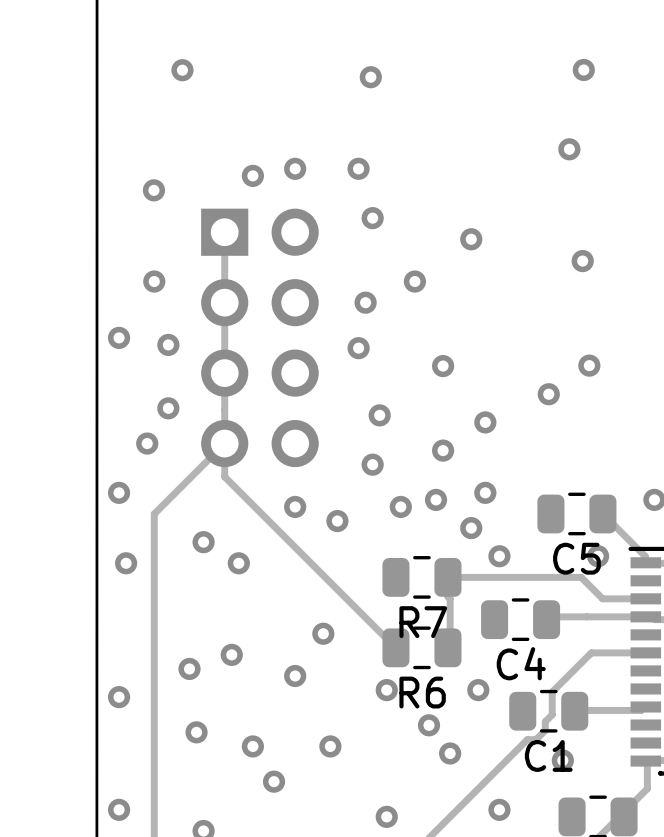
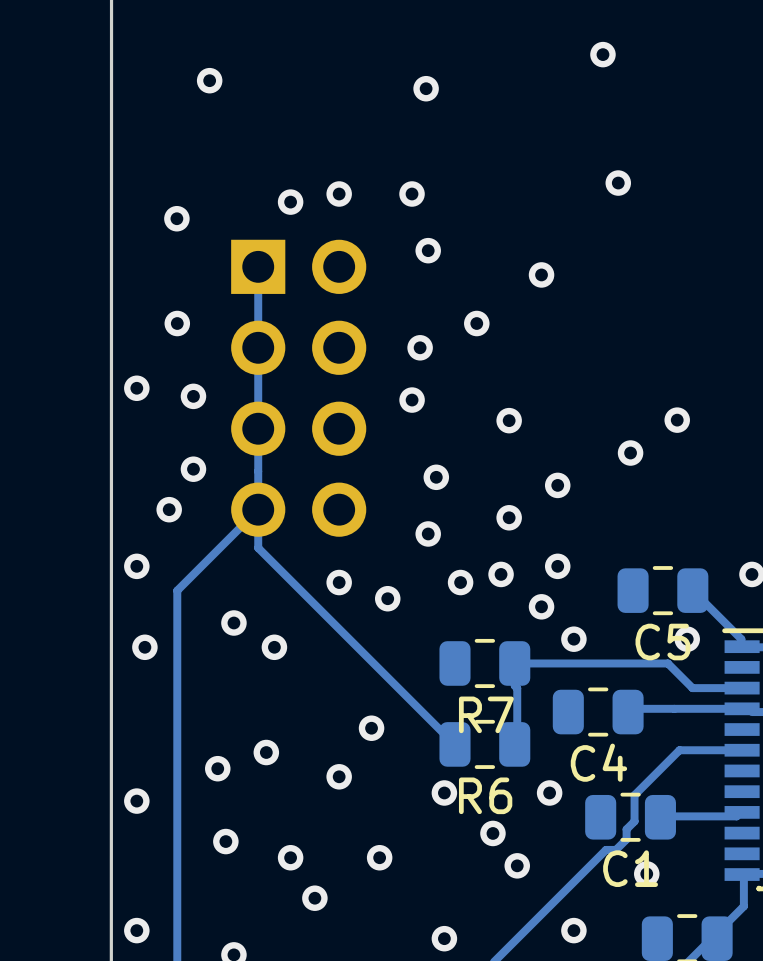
via: none -> (602, 54)
via: (583, 69) -> none
via position: (569, 149) -> (618, 183)
via: (582, 261) -> none

